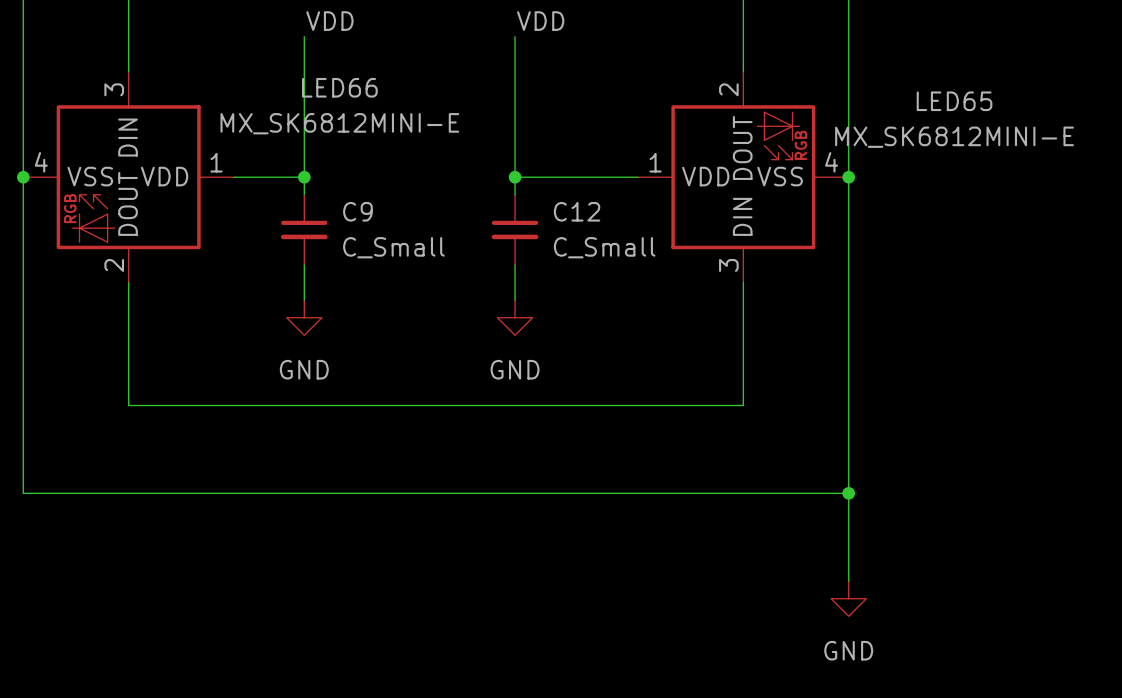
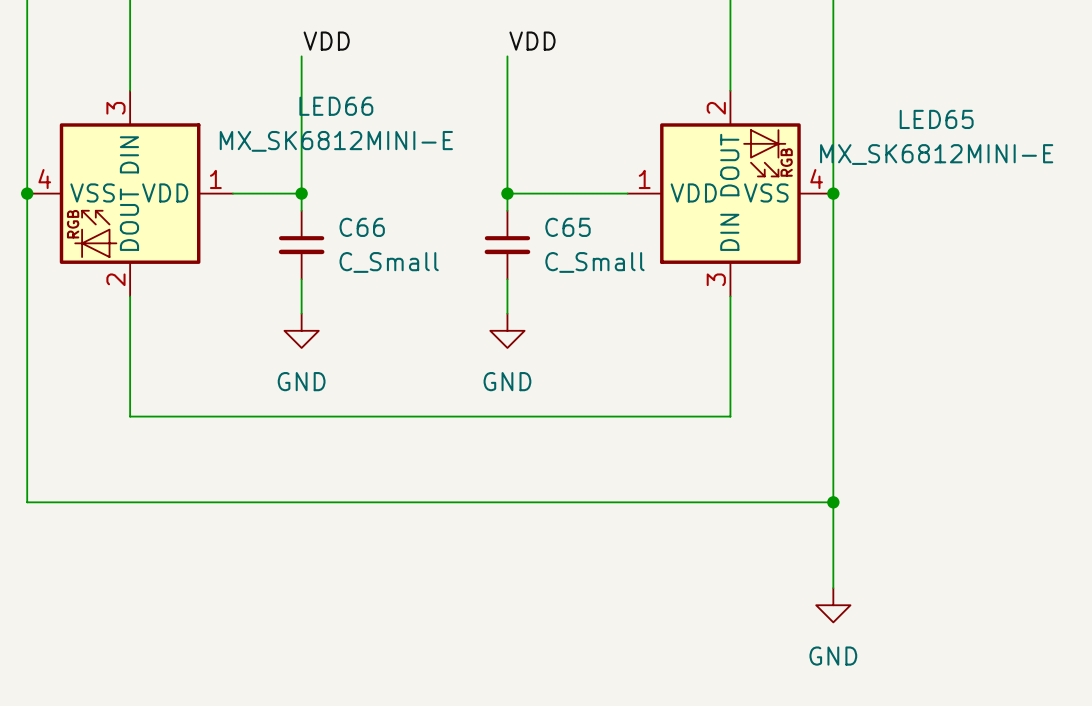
C9 name: C9 (357, 211) -> C66 (362, 227)
C12 name: C12 (577, 211) -> C65 (568, 227)

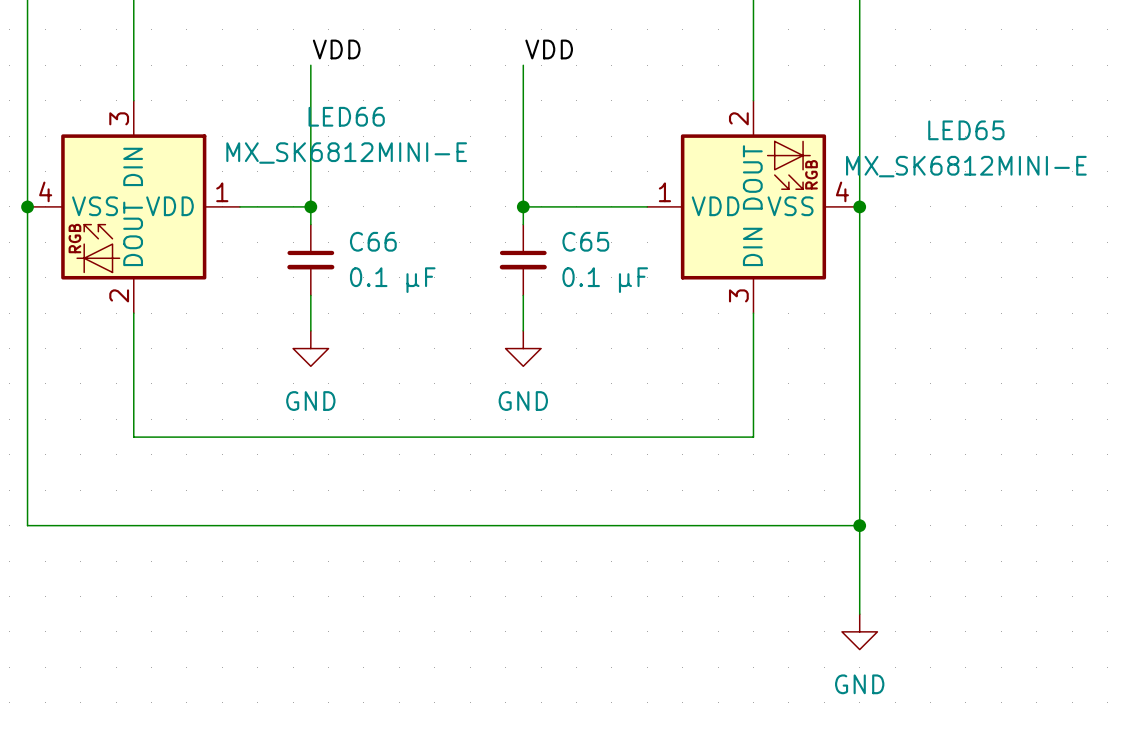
C66 value: C_Small (389, 262) -> 0.1 µF (392, 280)
C65 value: C_Small (594, 262) -> 0.1 µF (605, 280)

